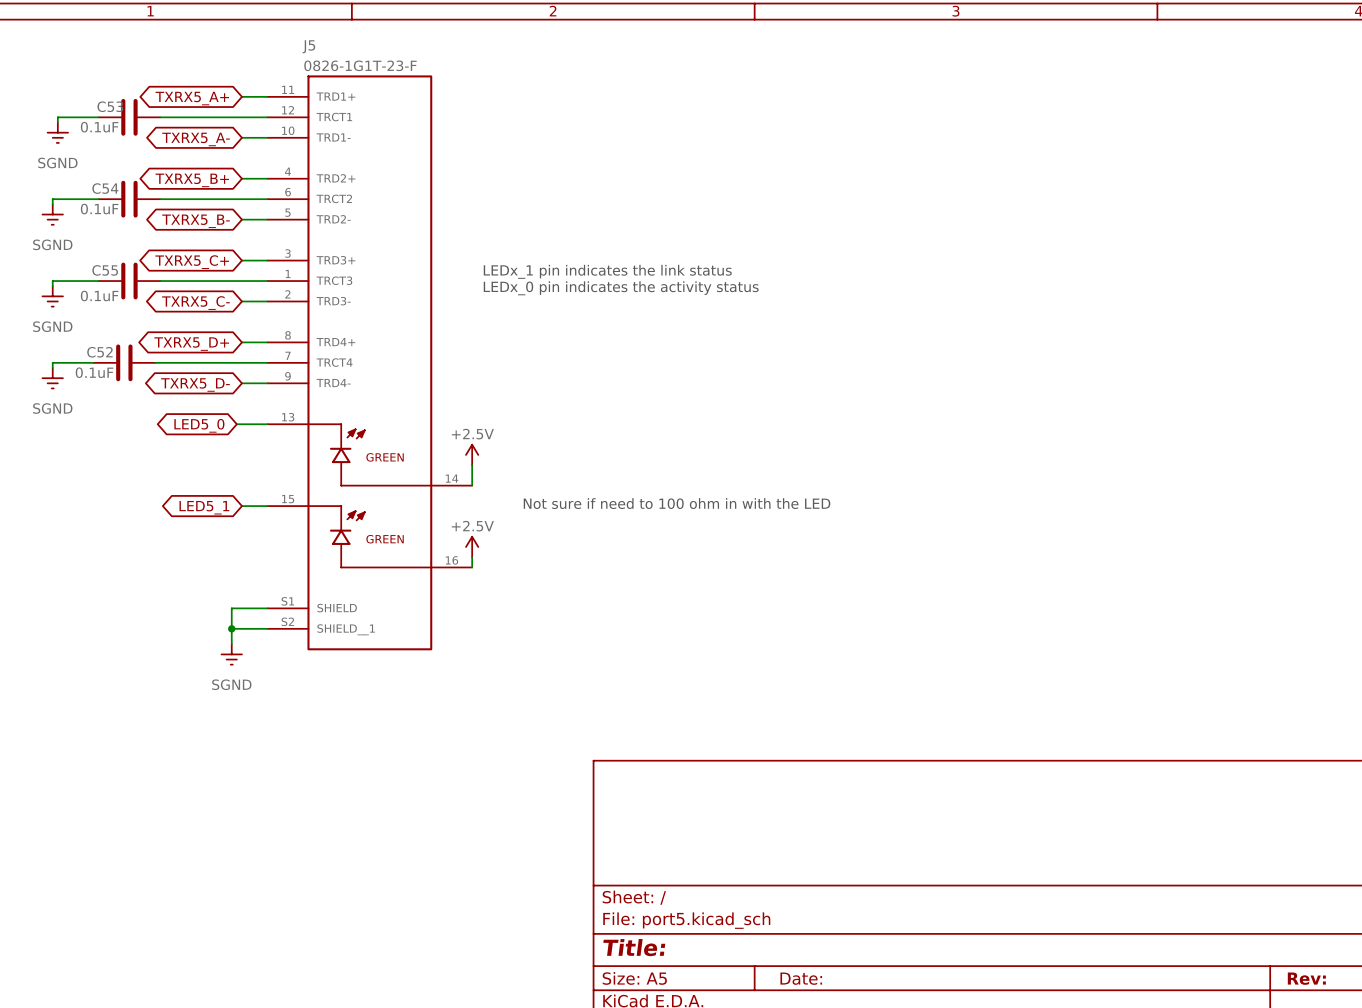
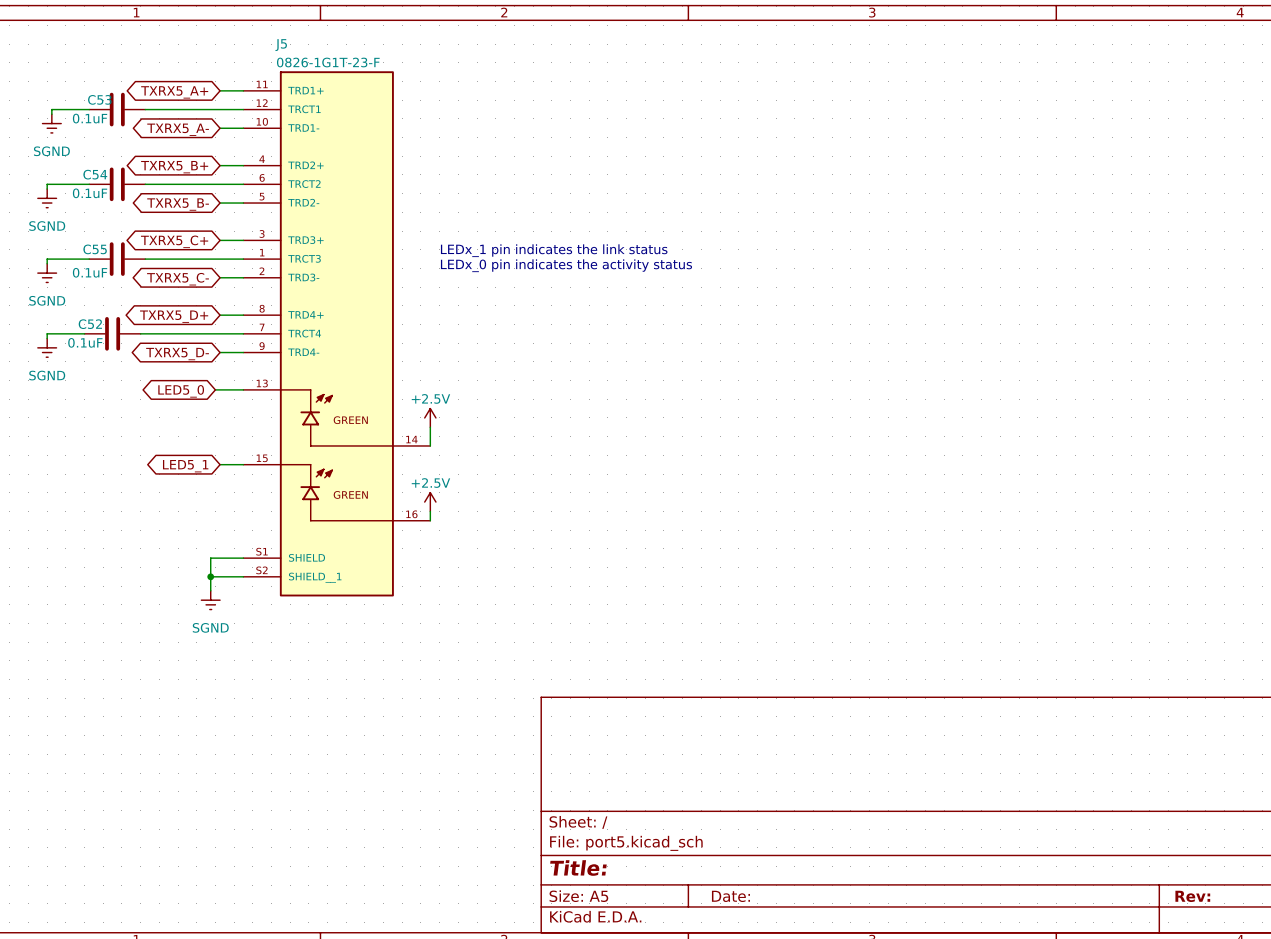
text: Not sure if need to 100 ohm in with the LED (677, 503) -> none

